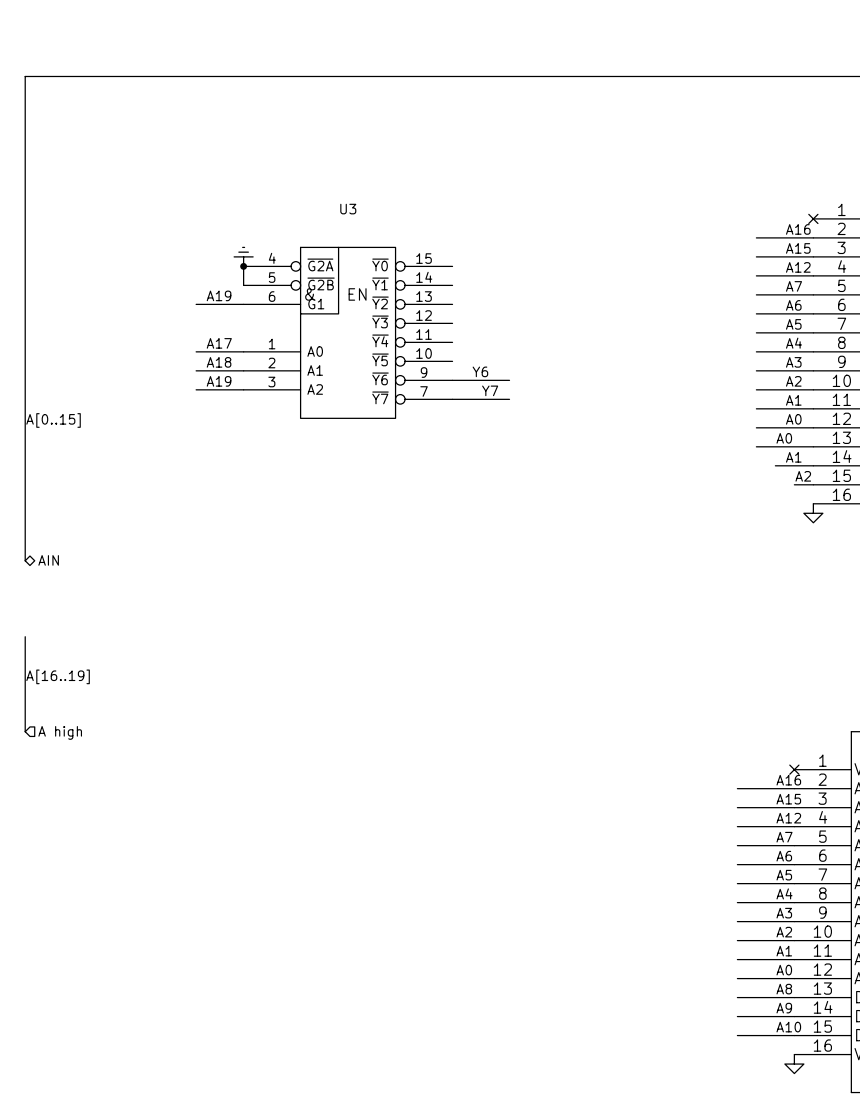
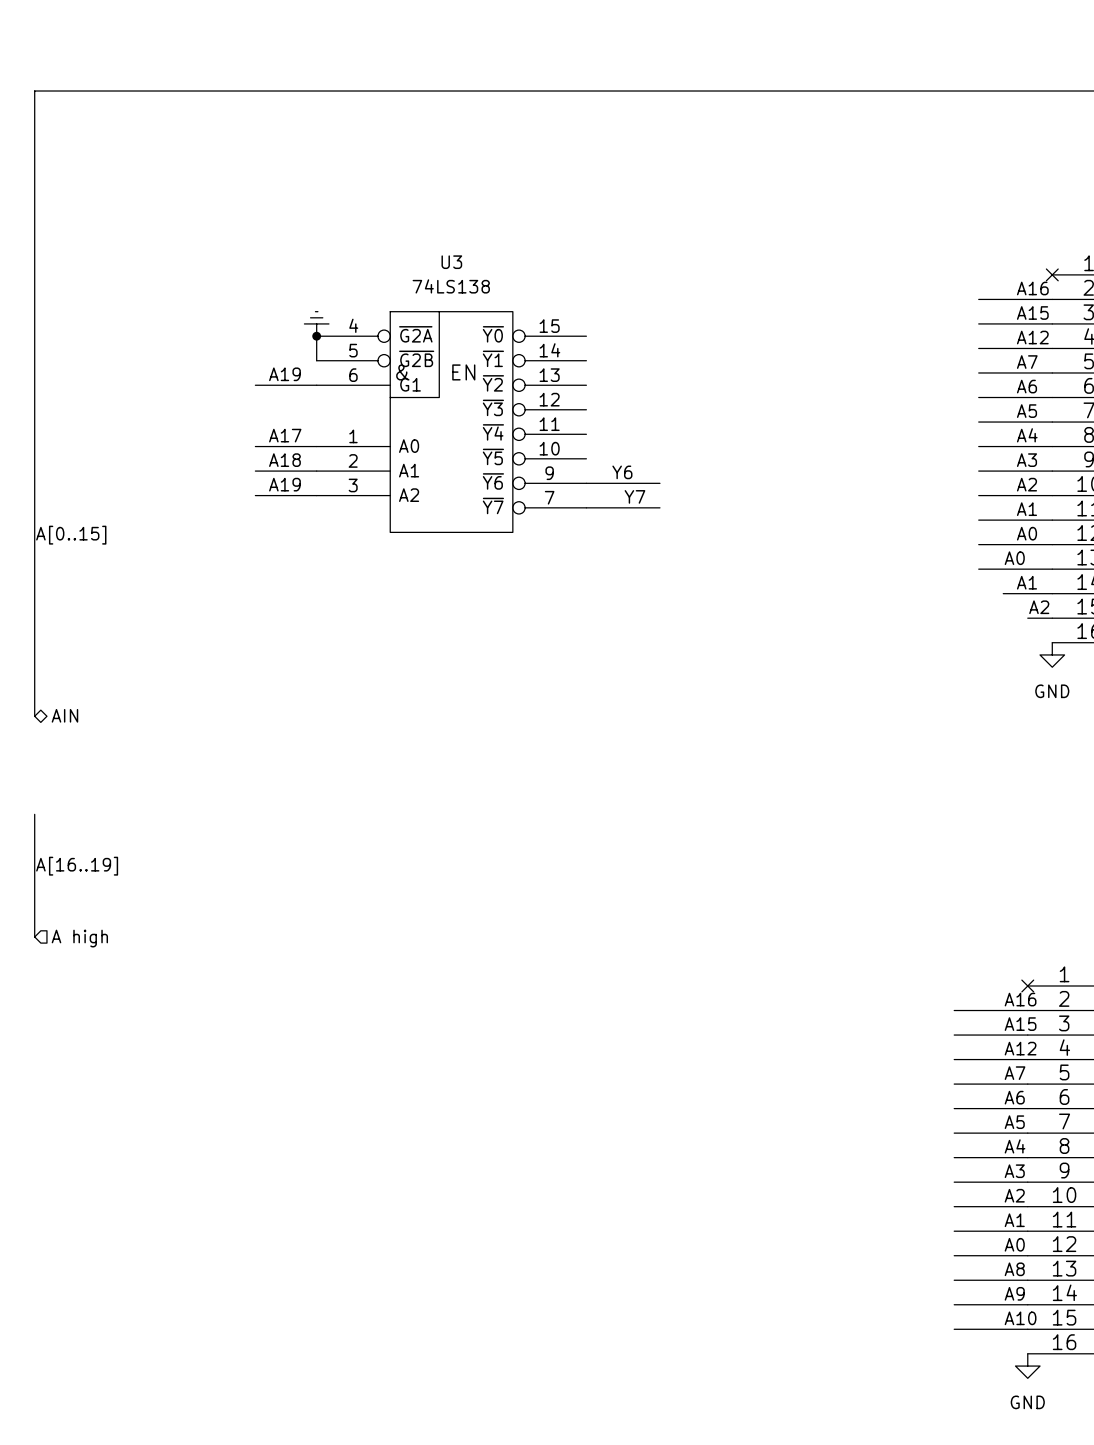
U3 value: none -> 74LS138 (451, 286)
power symbol text: none -> GND (1052, 691)
power symbol text: none -> GND (1027, 1402)

